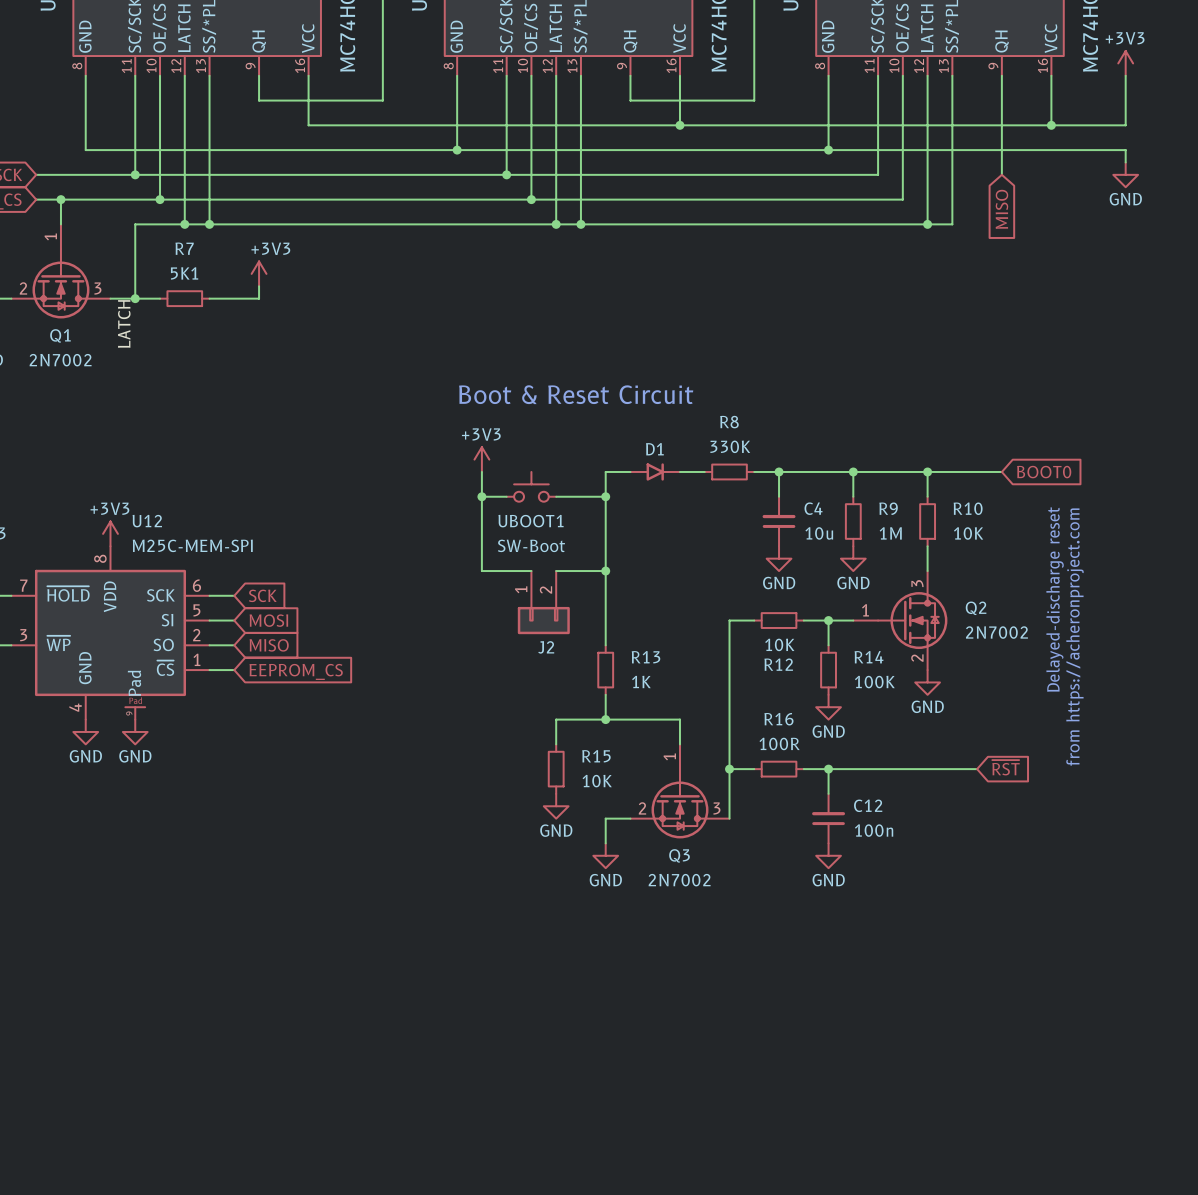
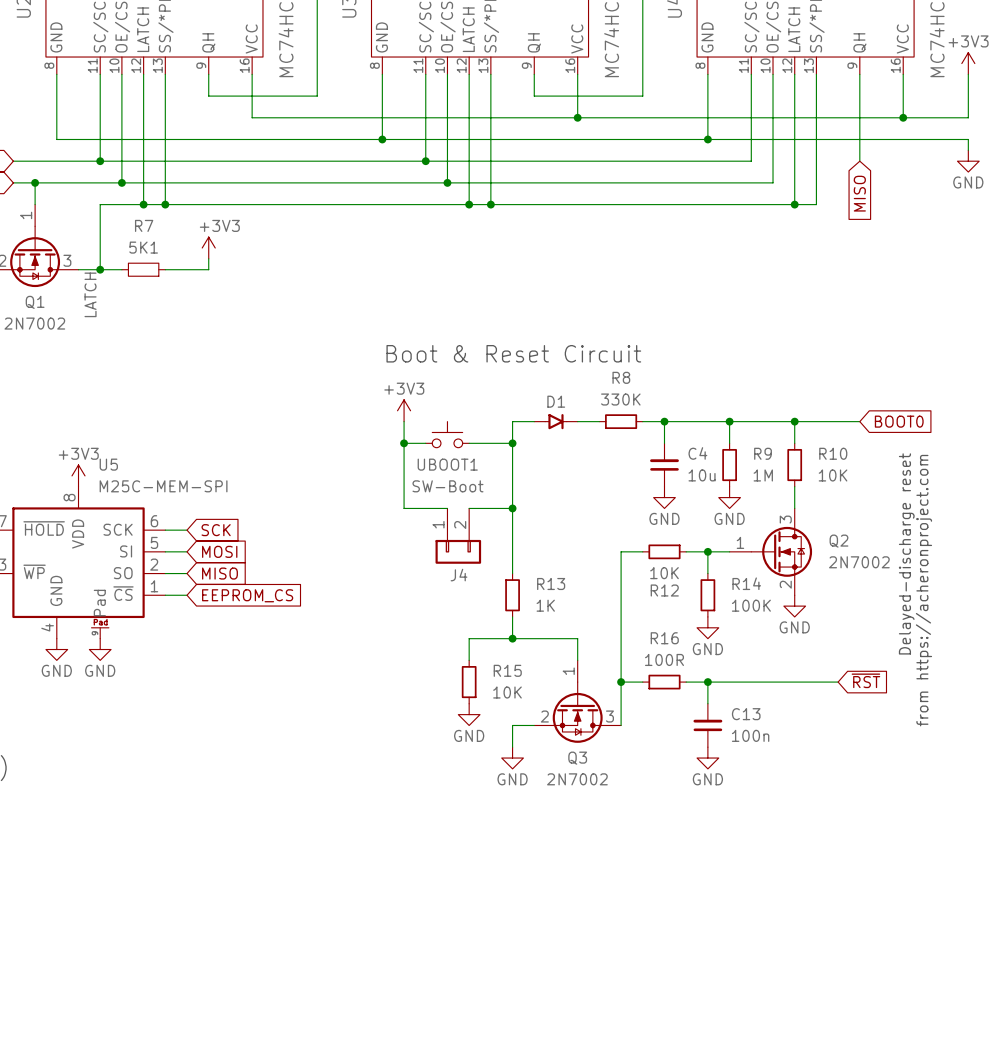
U12 name: U12 (147, 521) -> U5 (108, 464)
J2 name: J2 (546, 647) -> J4 (459, 575)
C12 name: C12 (868, 805) -> C13 (746, 714)

